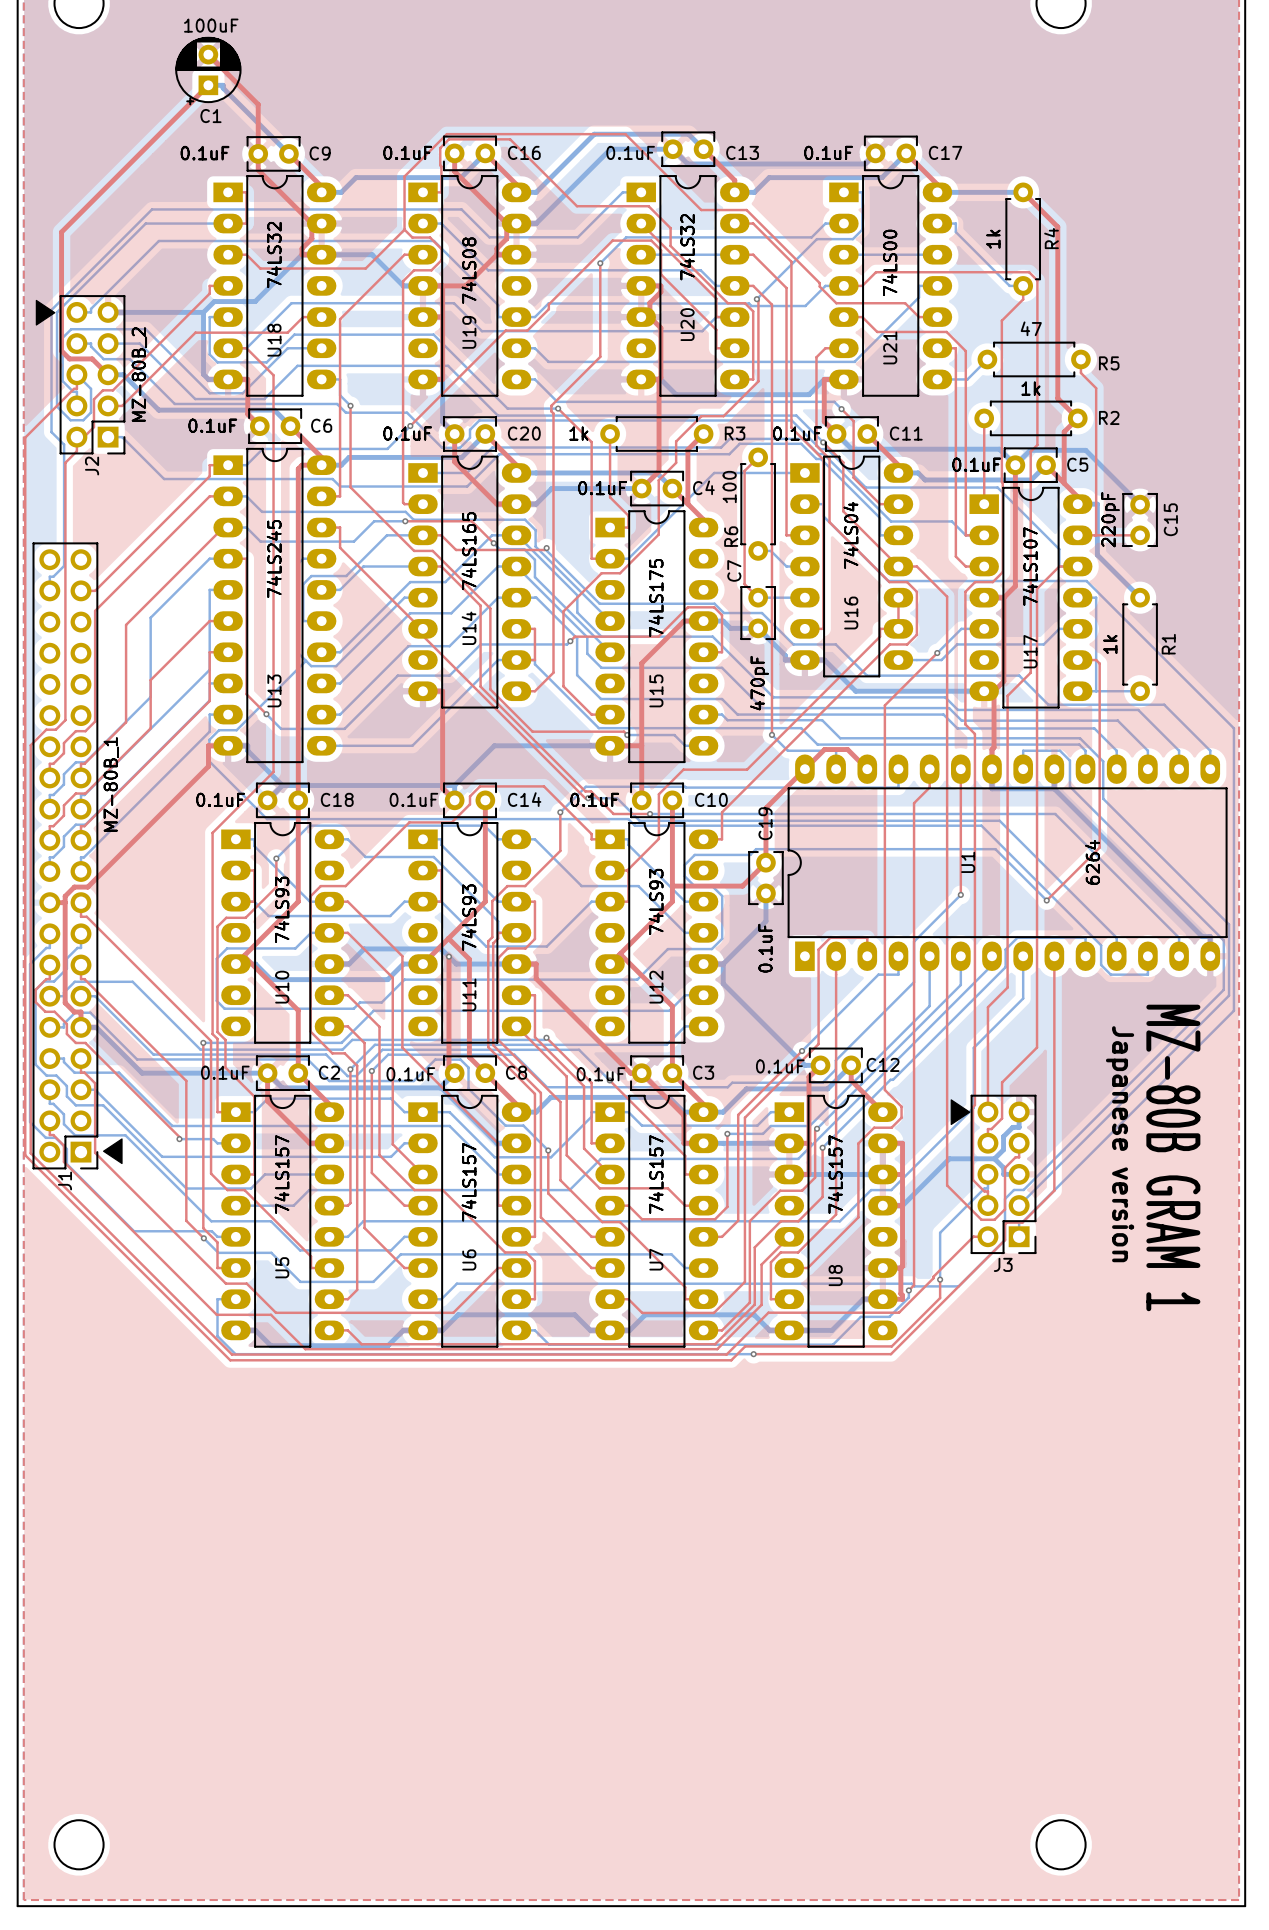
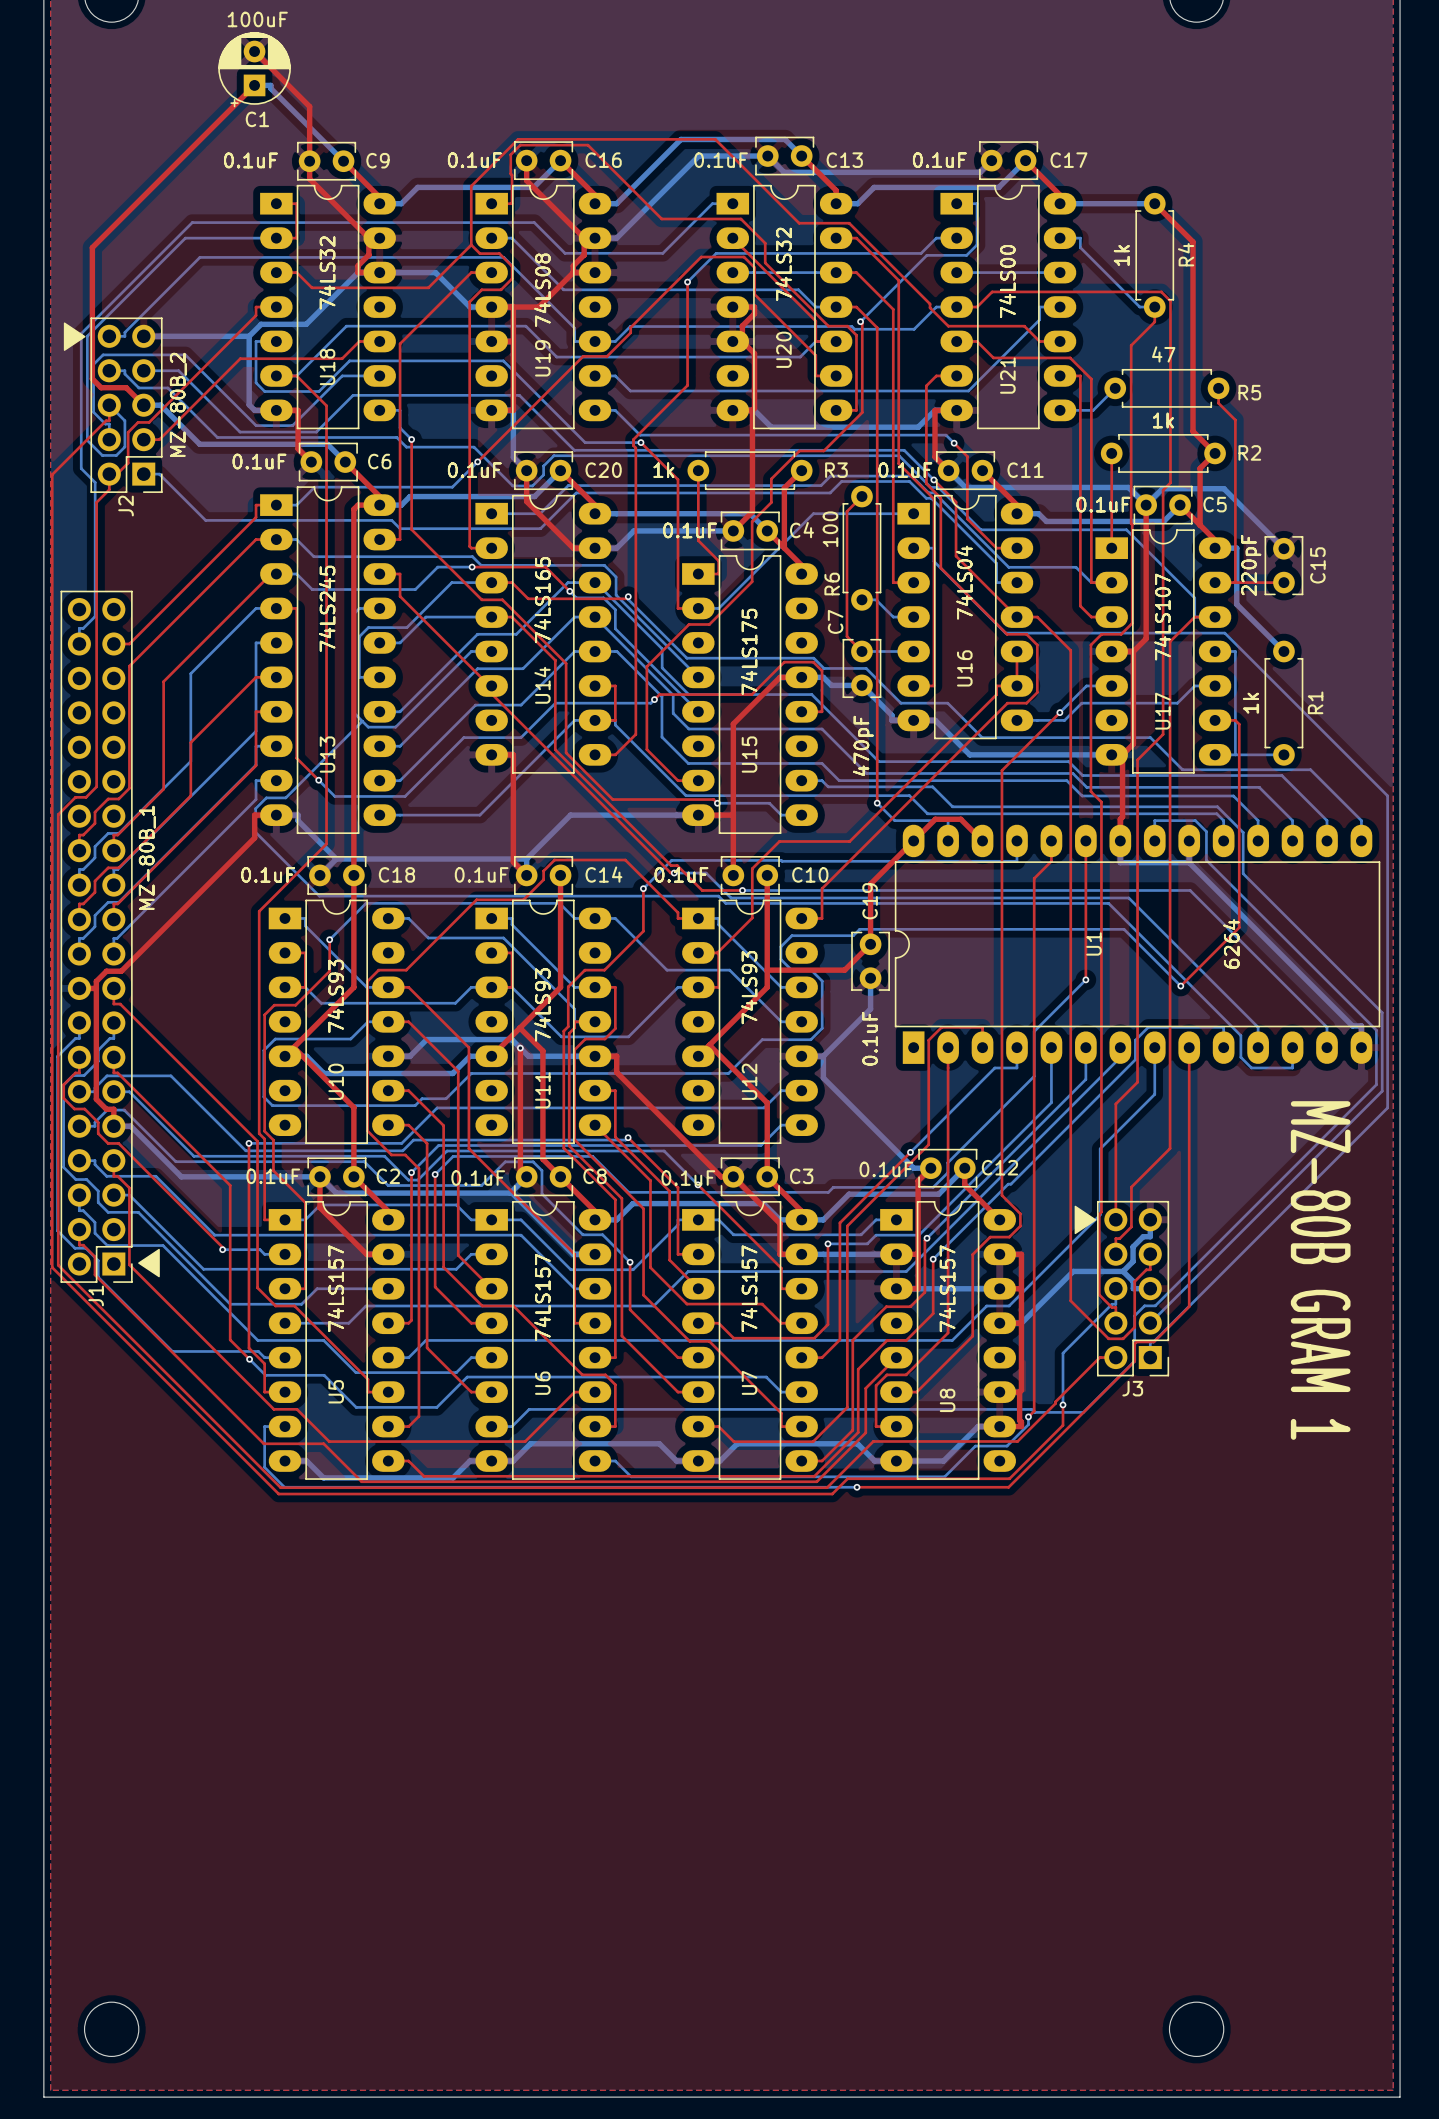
text: Japanese version (1120, 1144) -> none

